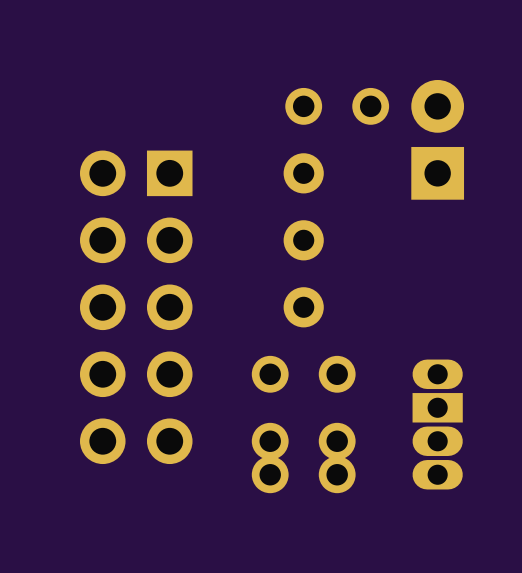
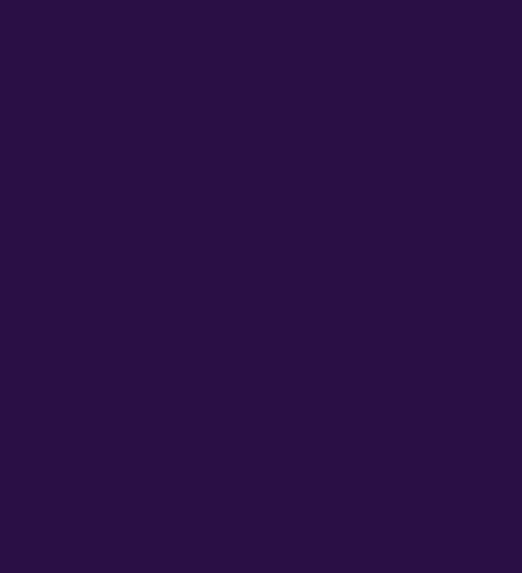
part: (337, 106) -> none
part: (437, 139) -> none
part: (303, 240) -> none
part: (136, 307) -> none
part: (303, 374) -> none
part: (437, 424) -> none
part: (303, 441) -> none
part: (303, 474) -> none

